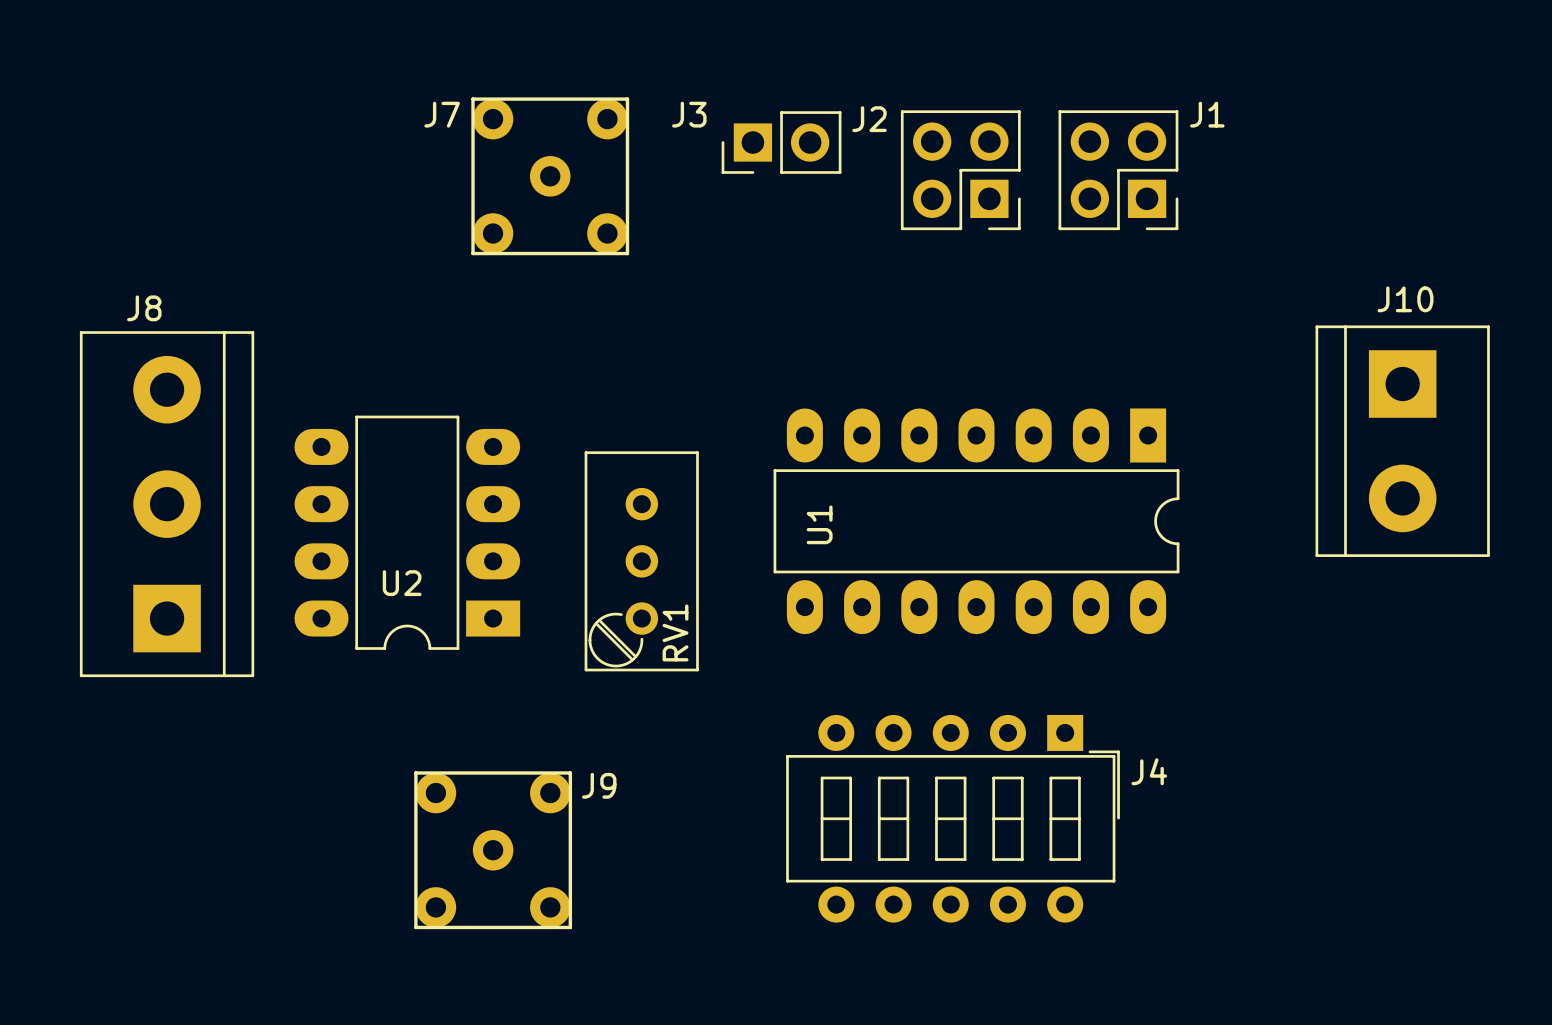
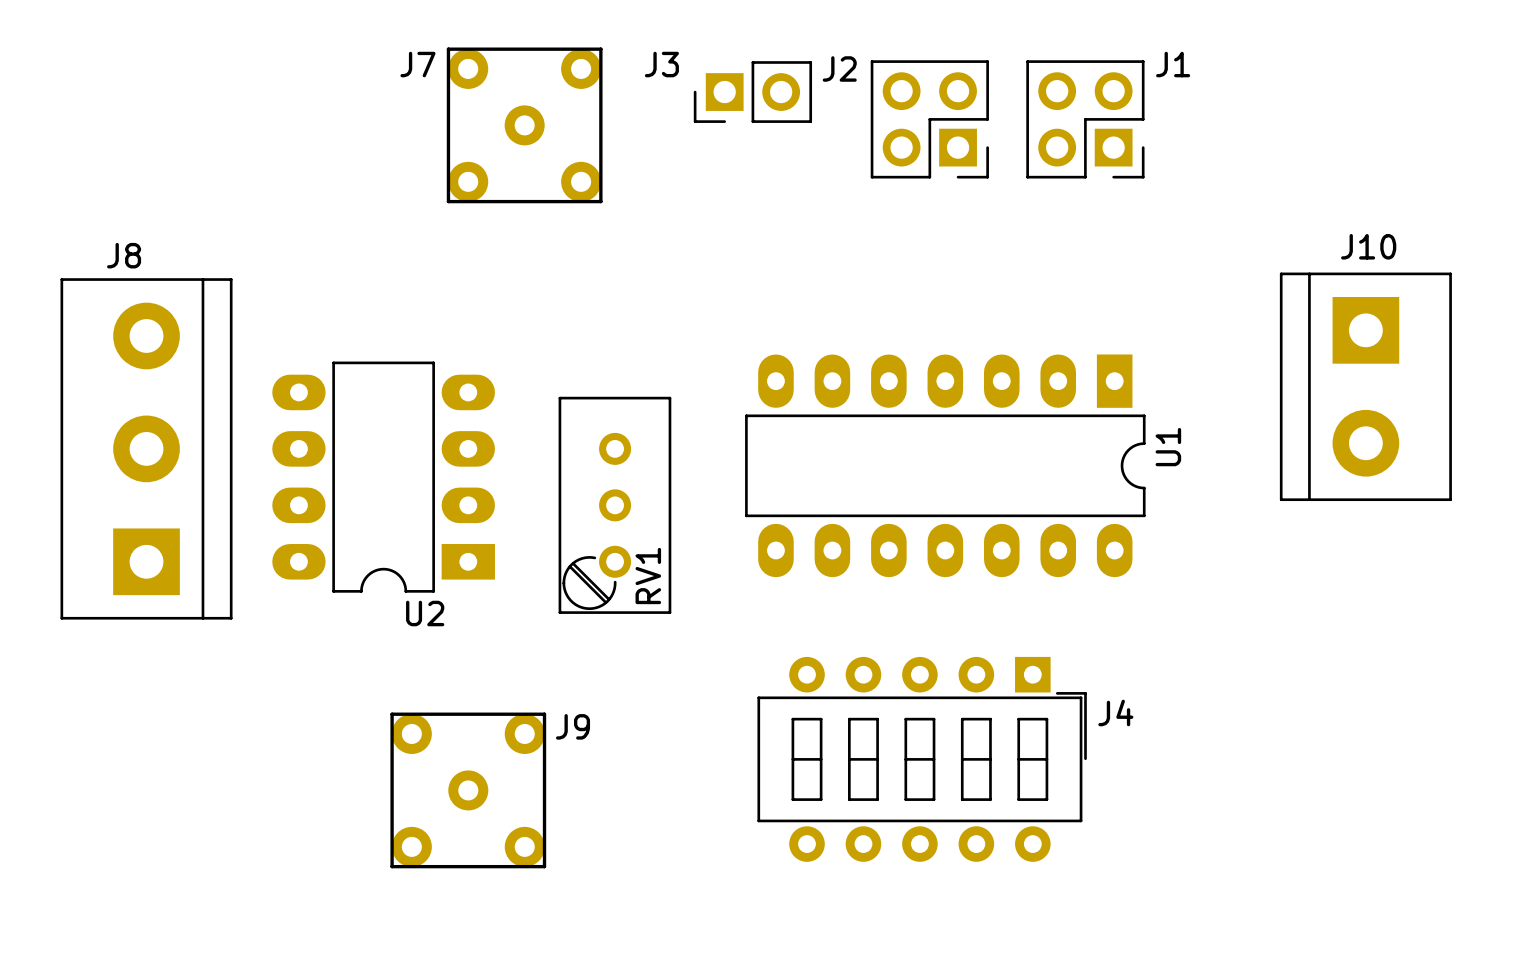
U1 name position: U1 (819, 524) -> U1 (1168, 447)
U2 name position: U2 (402, 583) -> U2 (425, 613)

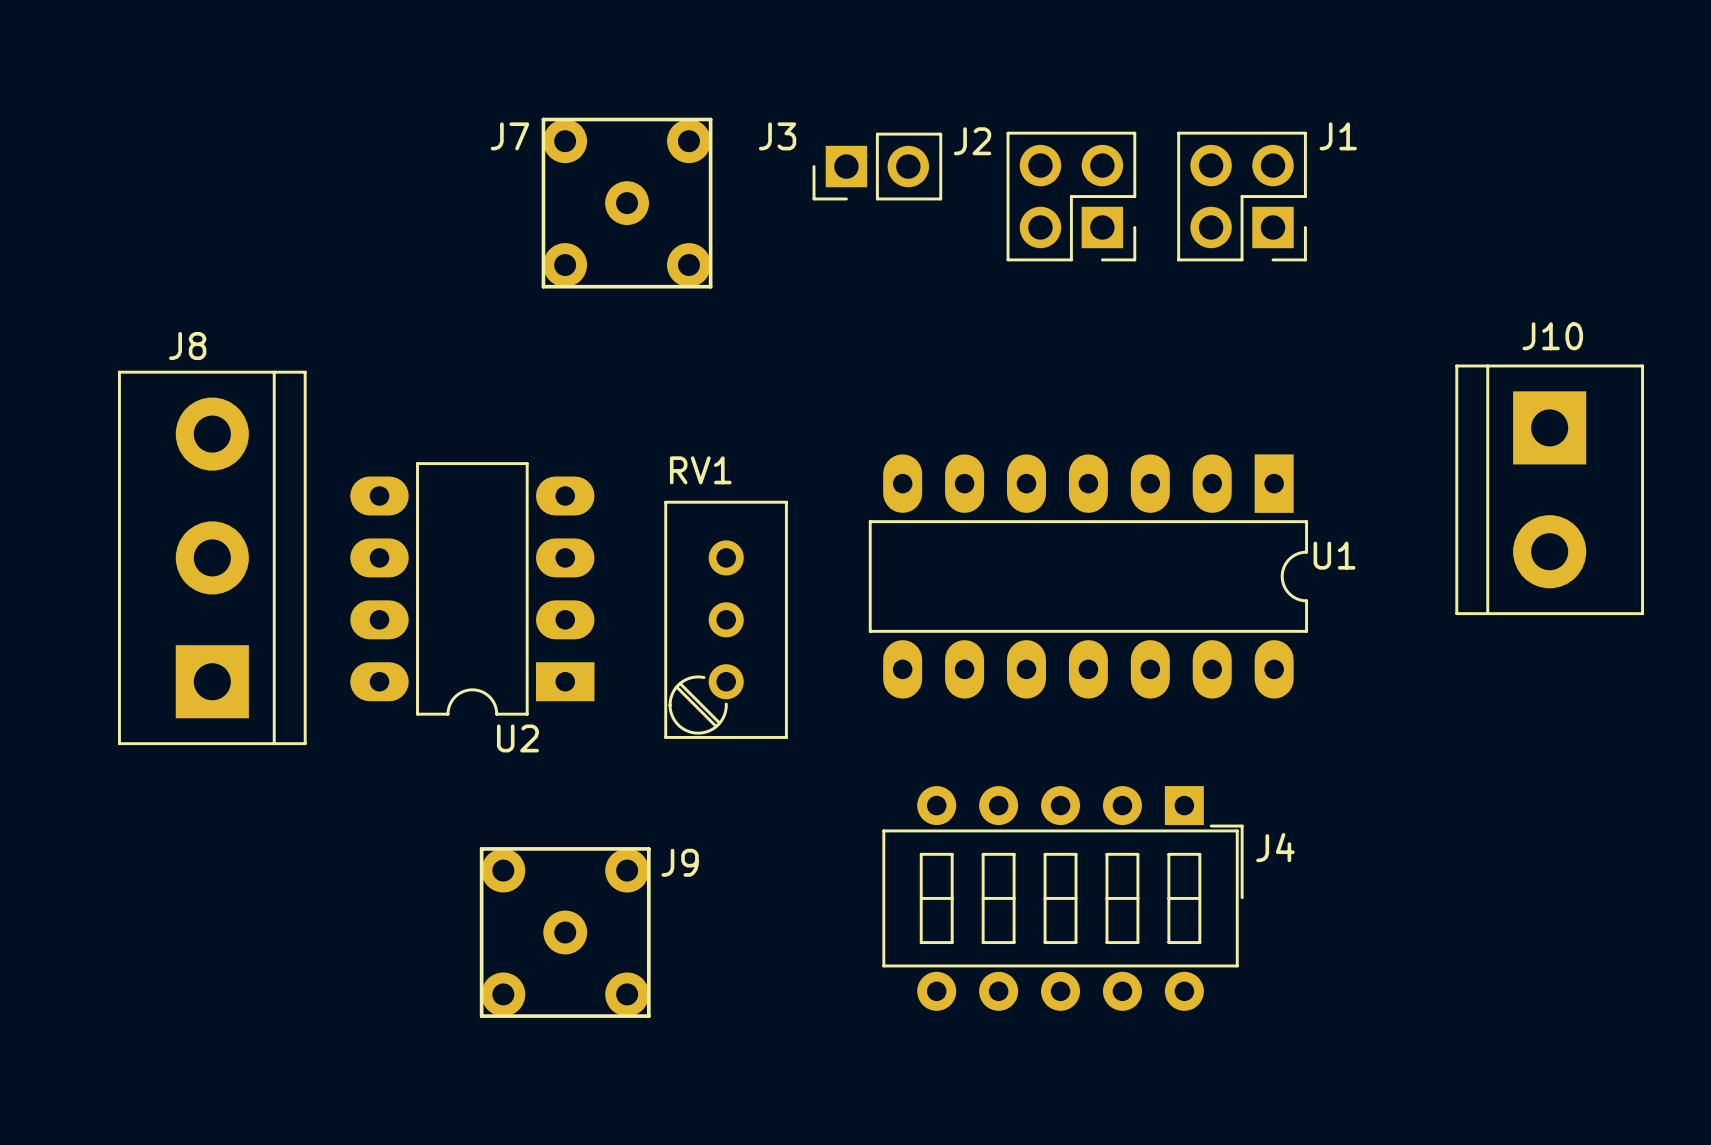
U1 name rotation: 0° (1168, 447) -> 90° clockwise (1334, 555)
RV1 name rotation: 0° (648, 576) -> 90° clockwise (700, 470)
RV1 name position: RV1 (648, 576) -> RV1 (700, 470)

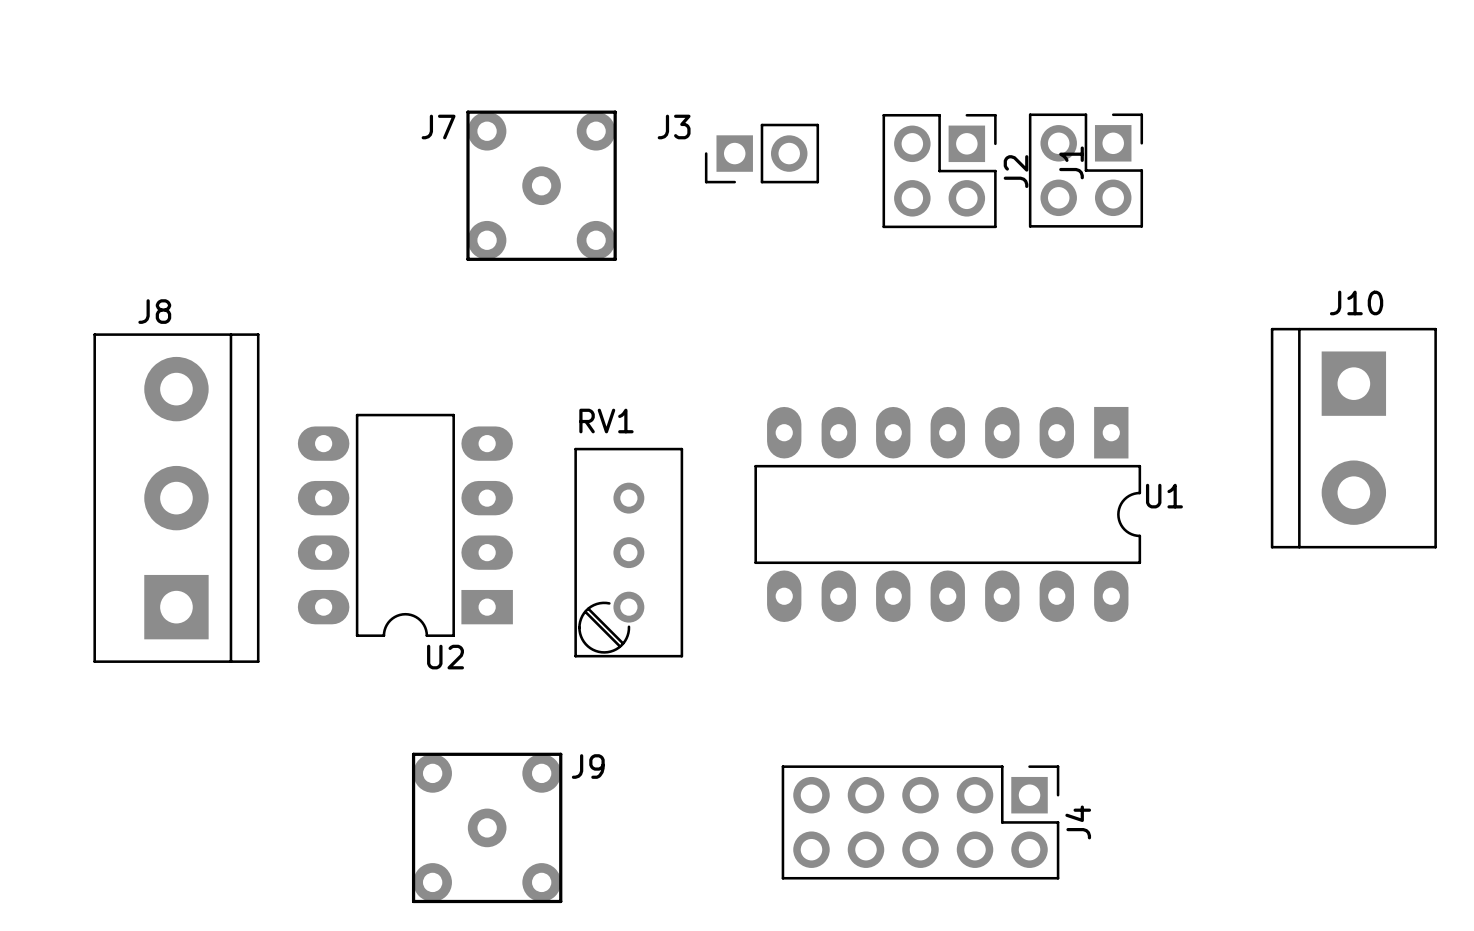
J1 name position: J1 (1338, 136) -> J1 (1071, 162)
J2 name position: J2 (972, 141) -> J2 (1016, 171)
J2 rotation: 0° (1071, 196) -> 90° counterclockwise (939, 171)
J1 rotation: 0° (1242, 196) -> 90° counterclockwise (1085, 170)
J4 footprint: [882, 786, 1244, 1011] -> [781, 765, 1060, 880]
J4 name position: J4 (1275, 847) -> J4 (1078, 822)

